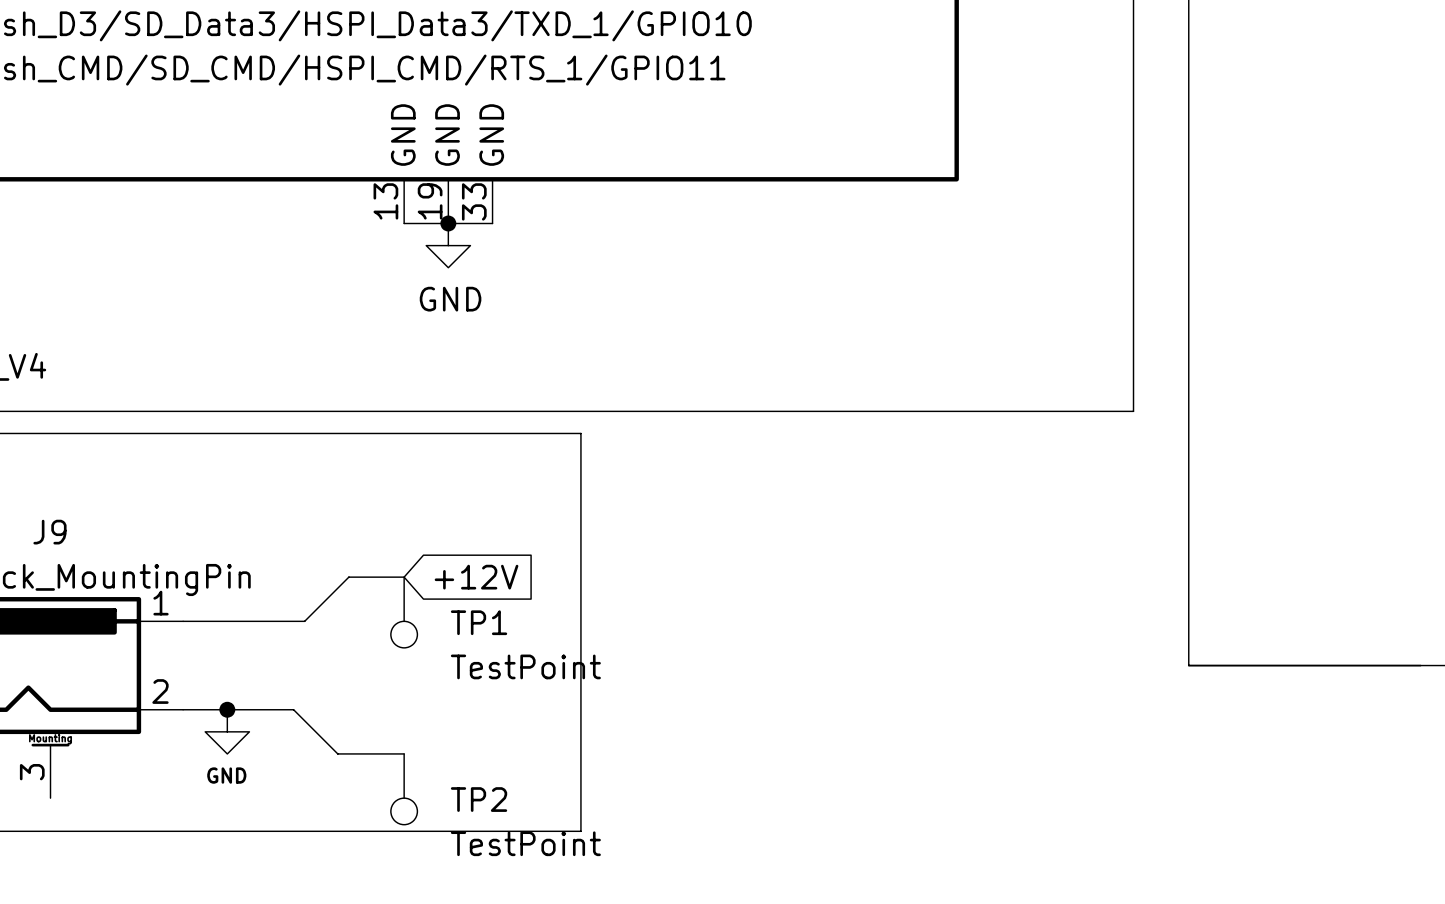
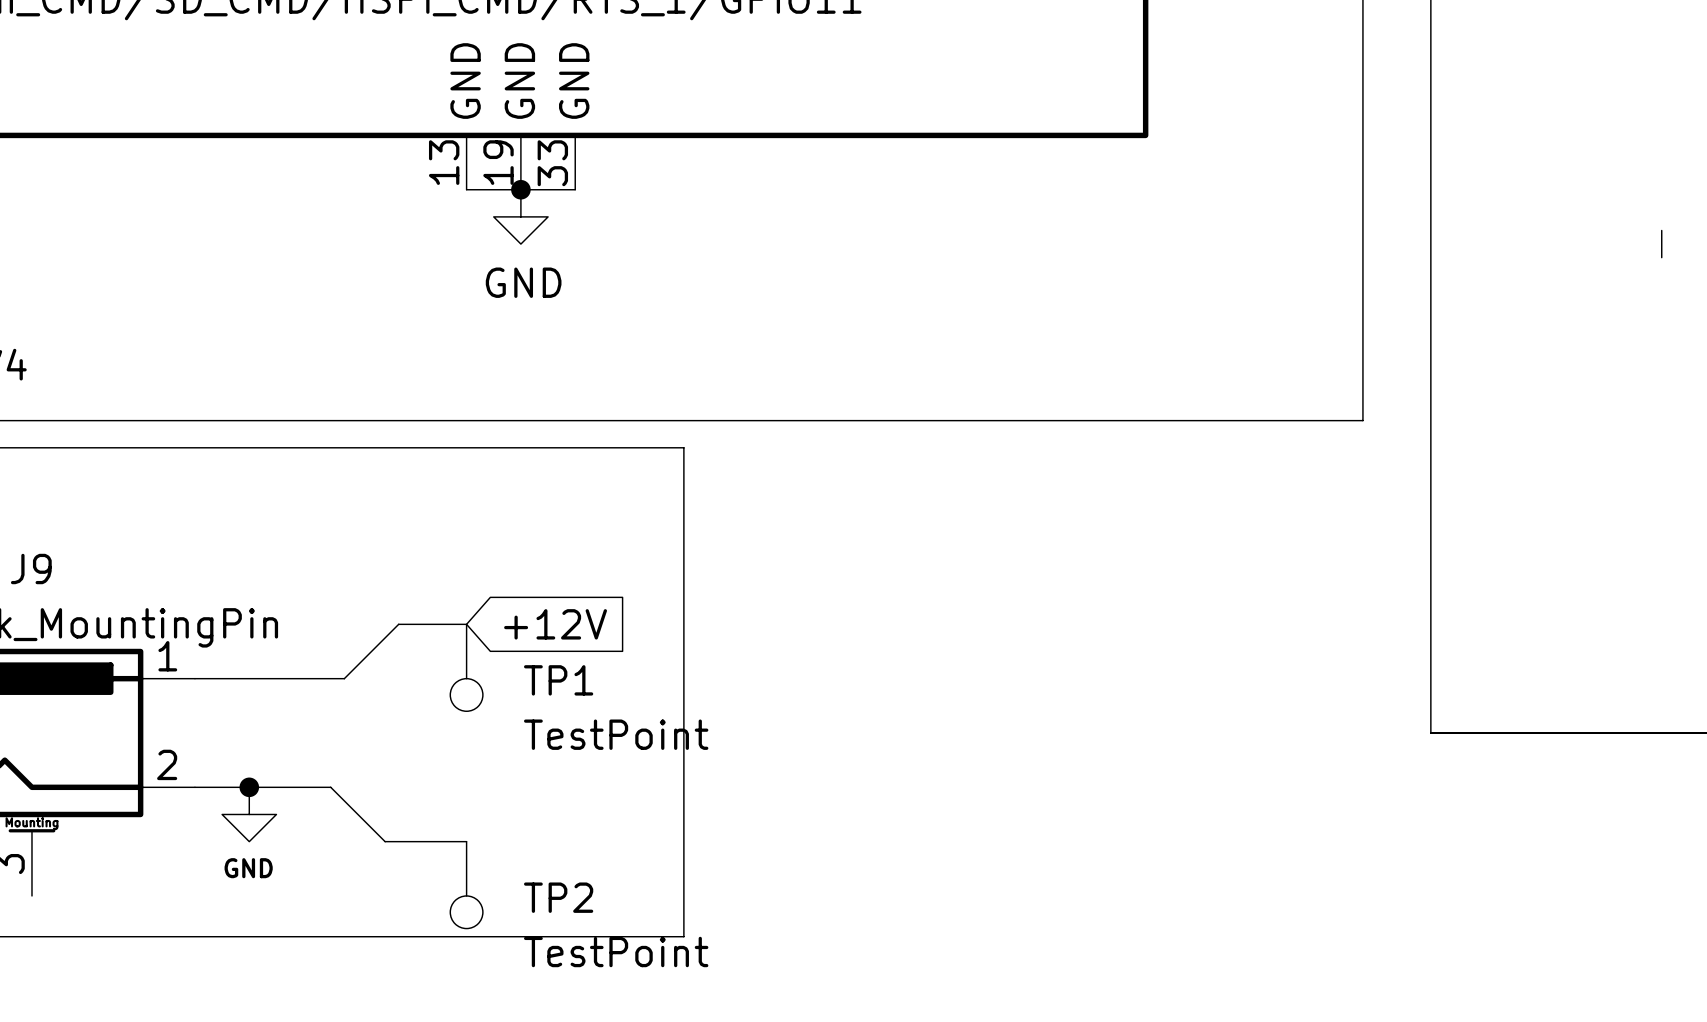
wire: none -> (1661, 230) (1661, 257)

